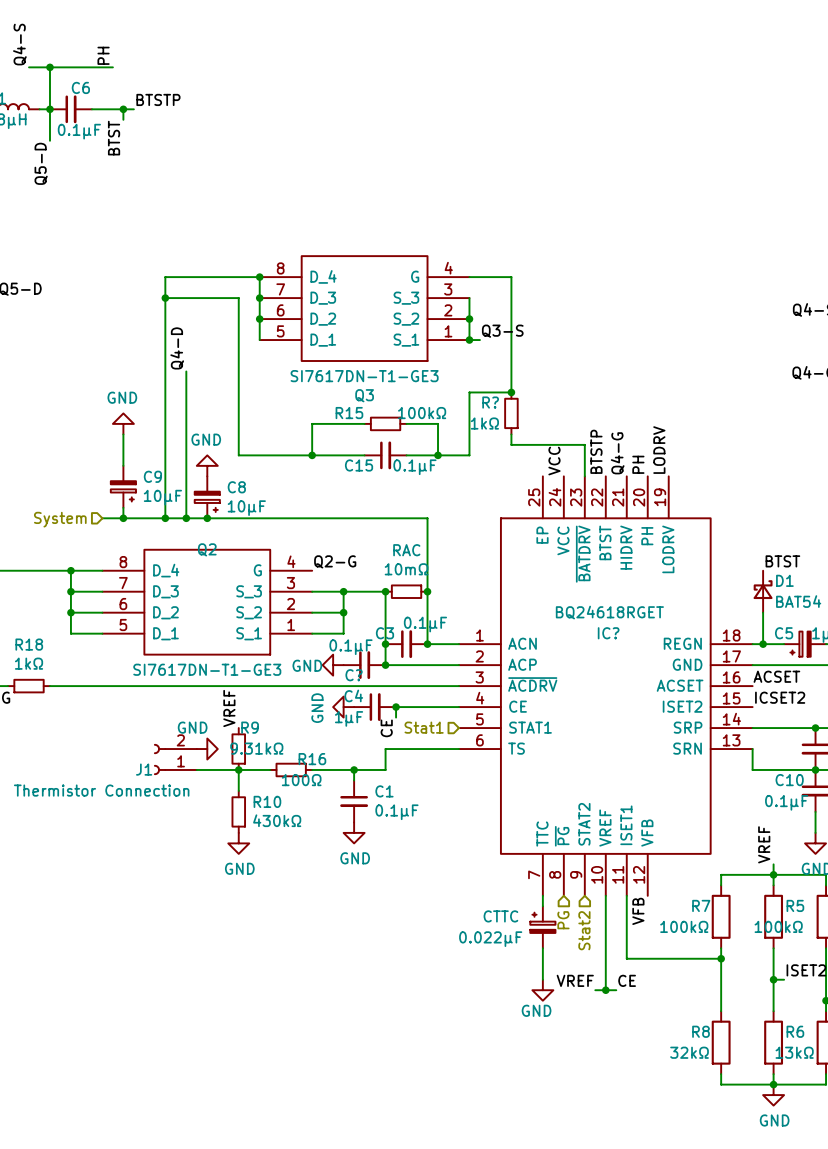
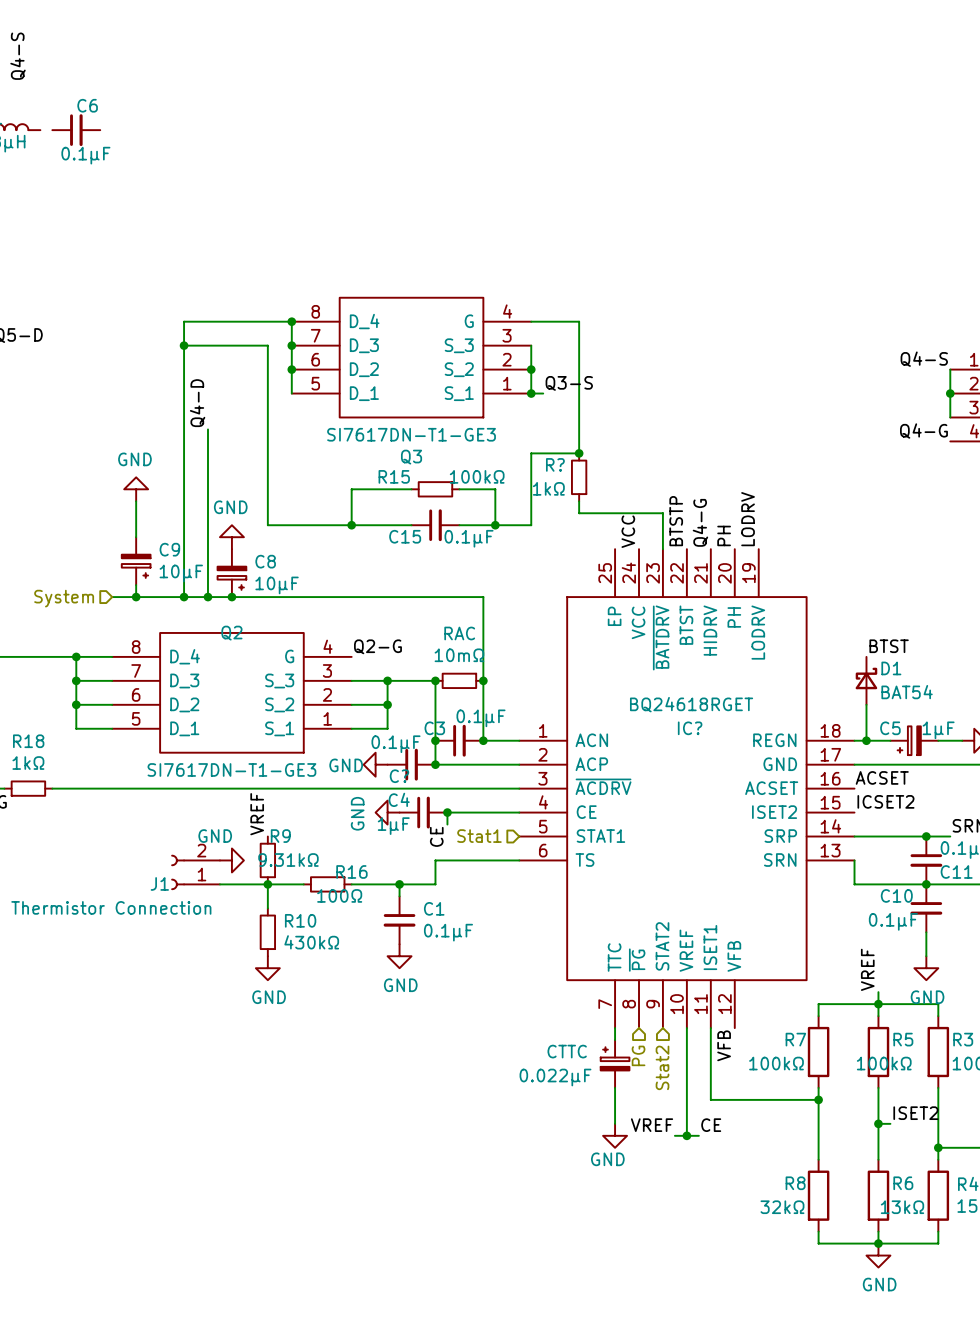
label: PH (103, 55) -> none
wire: (29, 67) (112, 67) -> none
wire: (49, 67) (49, 140) -> none
junction: (49, 67) -> none
label: BTSTP (158, 99) -> none
wire: (39, 109) (49, 109) -> none
junction: (49, 109) -> none
wire: (91, 109) (133, 109) -> none
wire: (123, 109) (123, 119) -> none
junction: (123, 109) -> none
label: BTST (114, 138) -> none
label: Q5-D (41, 163) -> none

